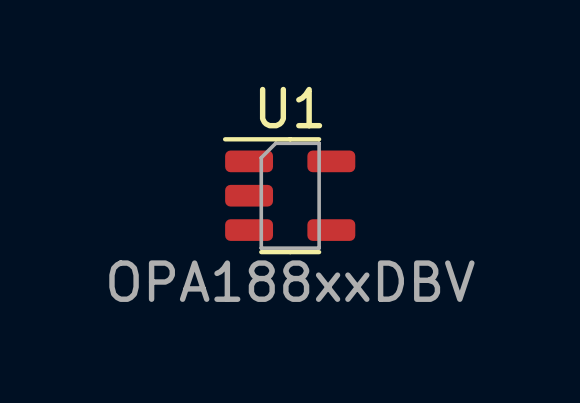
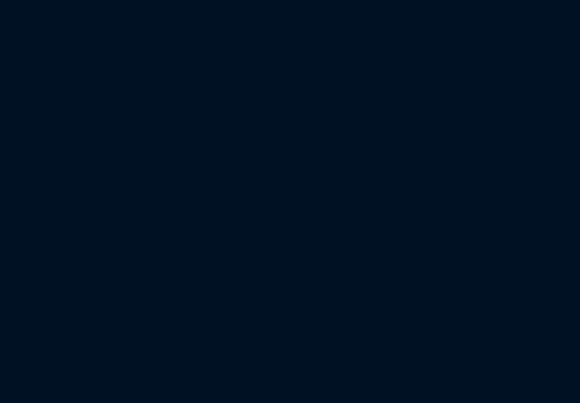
U1: OPA188xxDBV (289, 195) -> none

